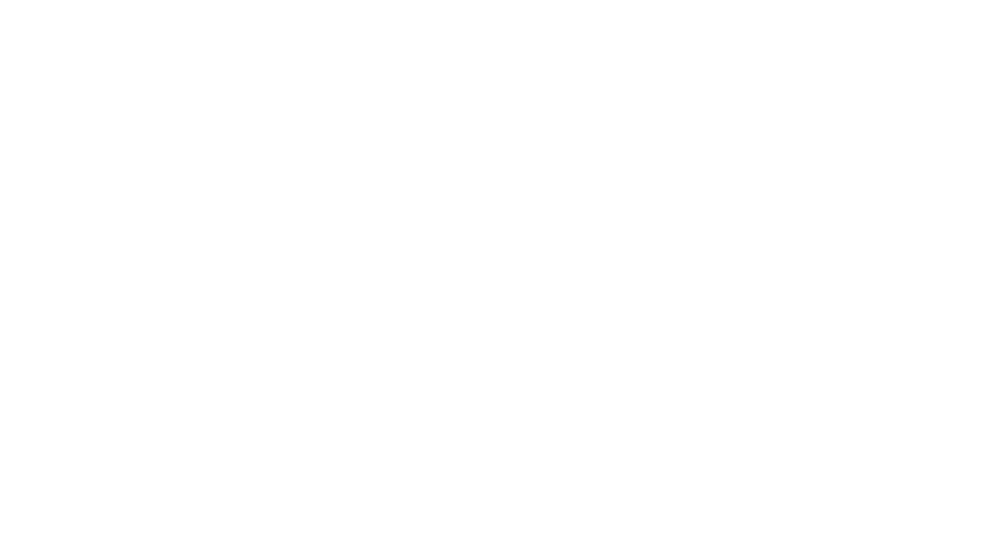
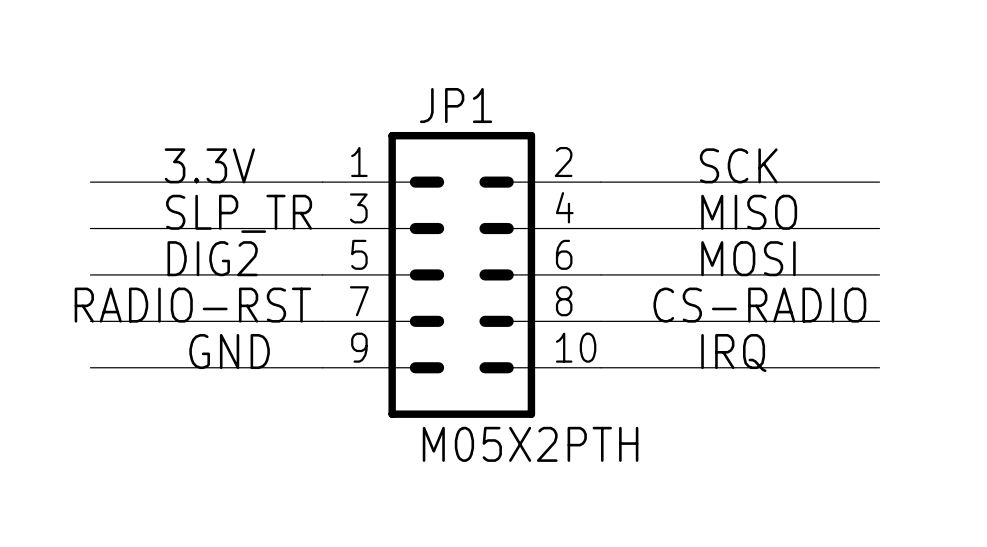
label: none -> 3.3V (209, 165)
label: none -> SCK (738, 165)
wire: none -> (90, 182) (322, 182)
wire: none -> (601, 182) (879, 182)
label: none -> MISO (749, 212)
label: none -> SLP_TR (239, 213)
wire: none -> (90, 228) (322, 228)
wire: none -> (601, 228) (879, 228)
label: none -> DIG2 (212, 258)
label: none -> MOSI (748, 258)
wire: none -> (90, 274) (322, 274)
JP1: none -> M05X2PTH (461, 274)
wire: none -> (601, 274) (879, 274)
label: none -> RADIO-RST (192, 305)
label: none -> CS-RADIO (759, 305)
wire: none -> (90, 321) (322, 321)
wire: none -> (601, 321) (879, 321)
label: none -> GND (229, 351)
label: none -> IRQ (733, 353)
wire: none -> (90, 367) (322, 367)
wire: none -> (601, 367) (879, 367)

